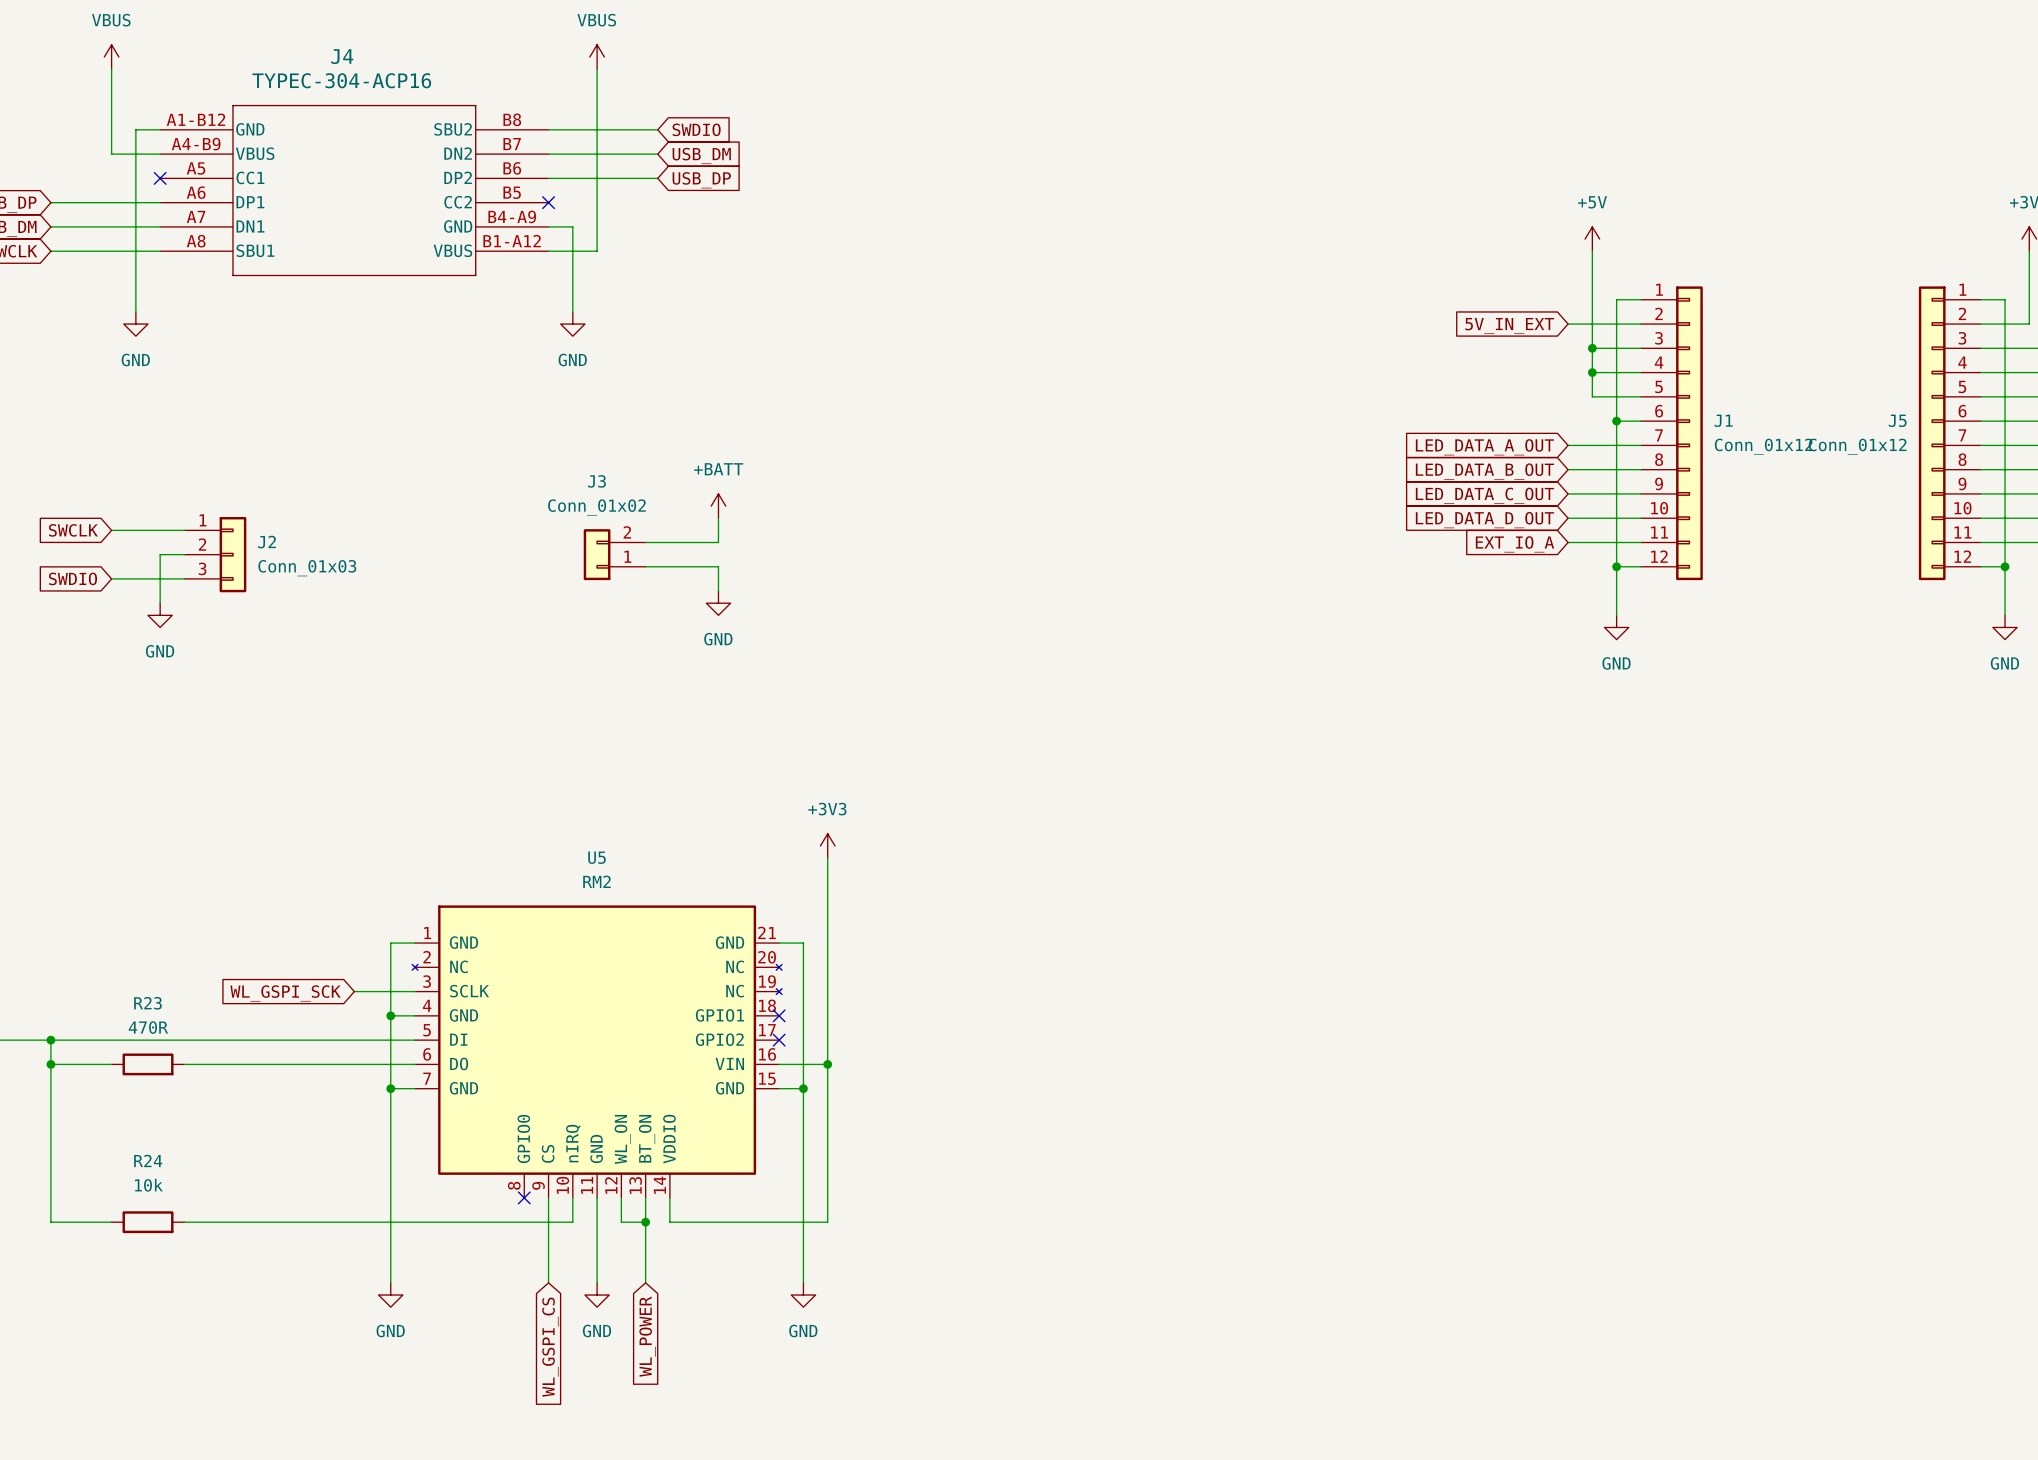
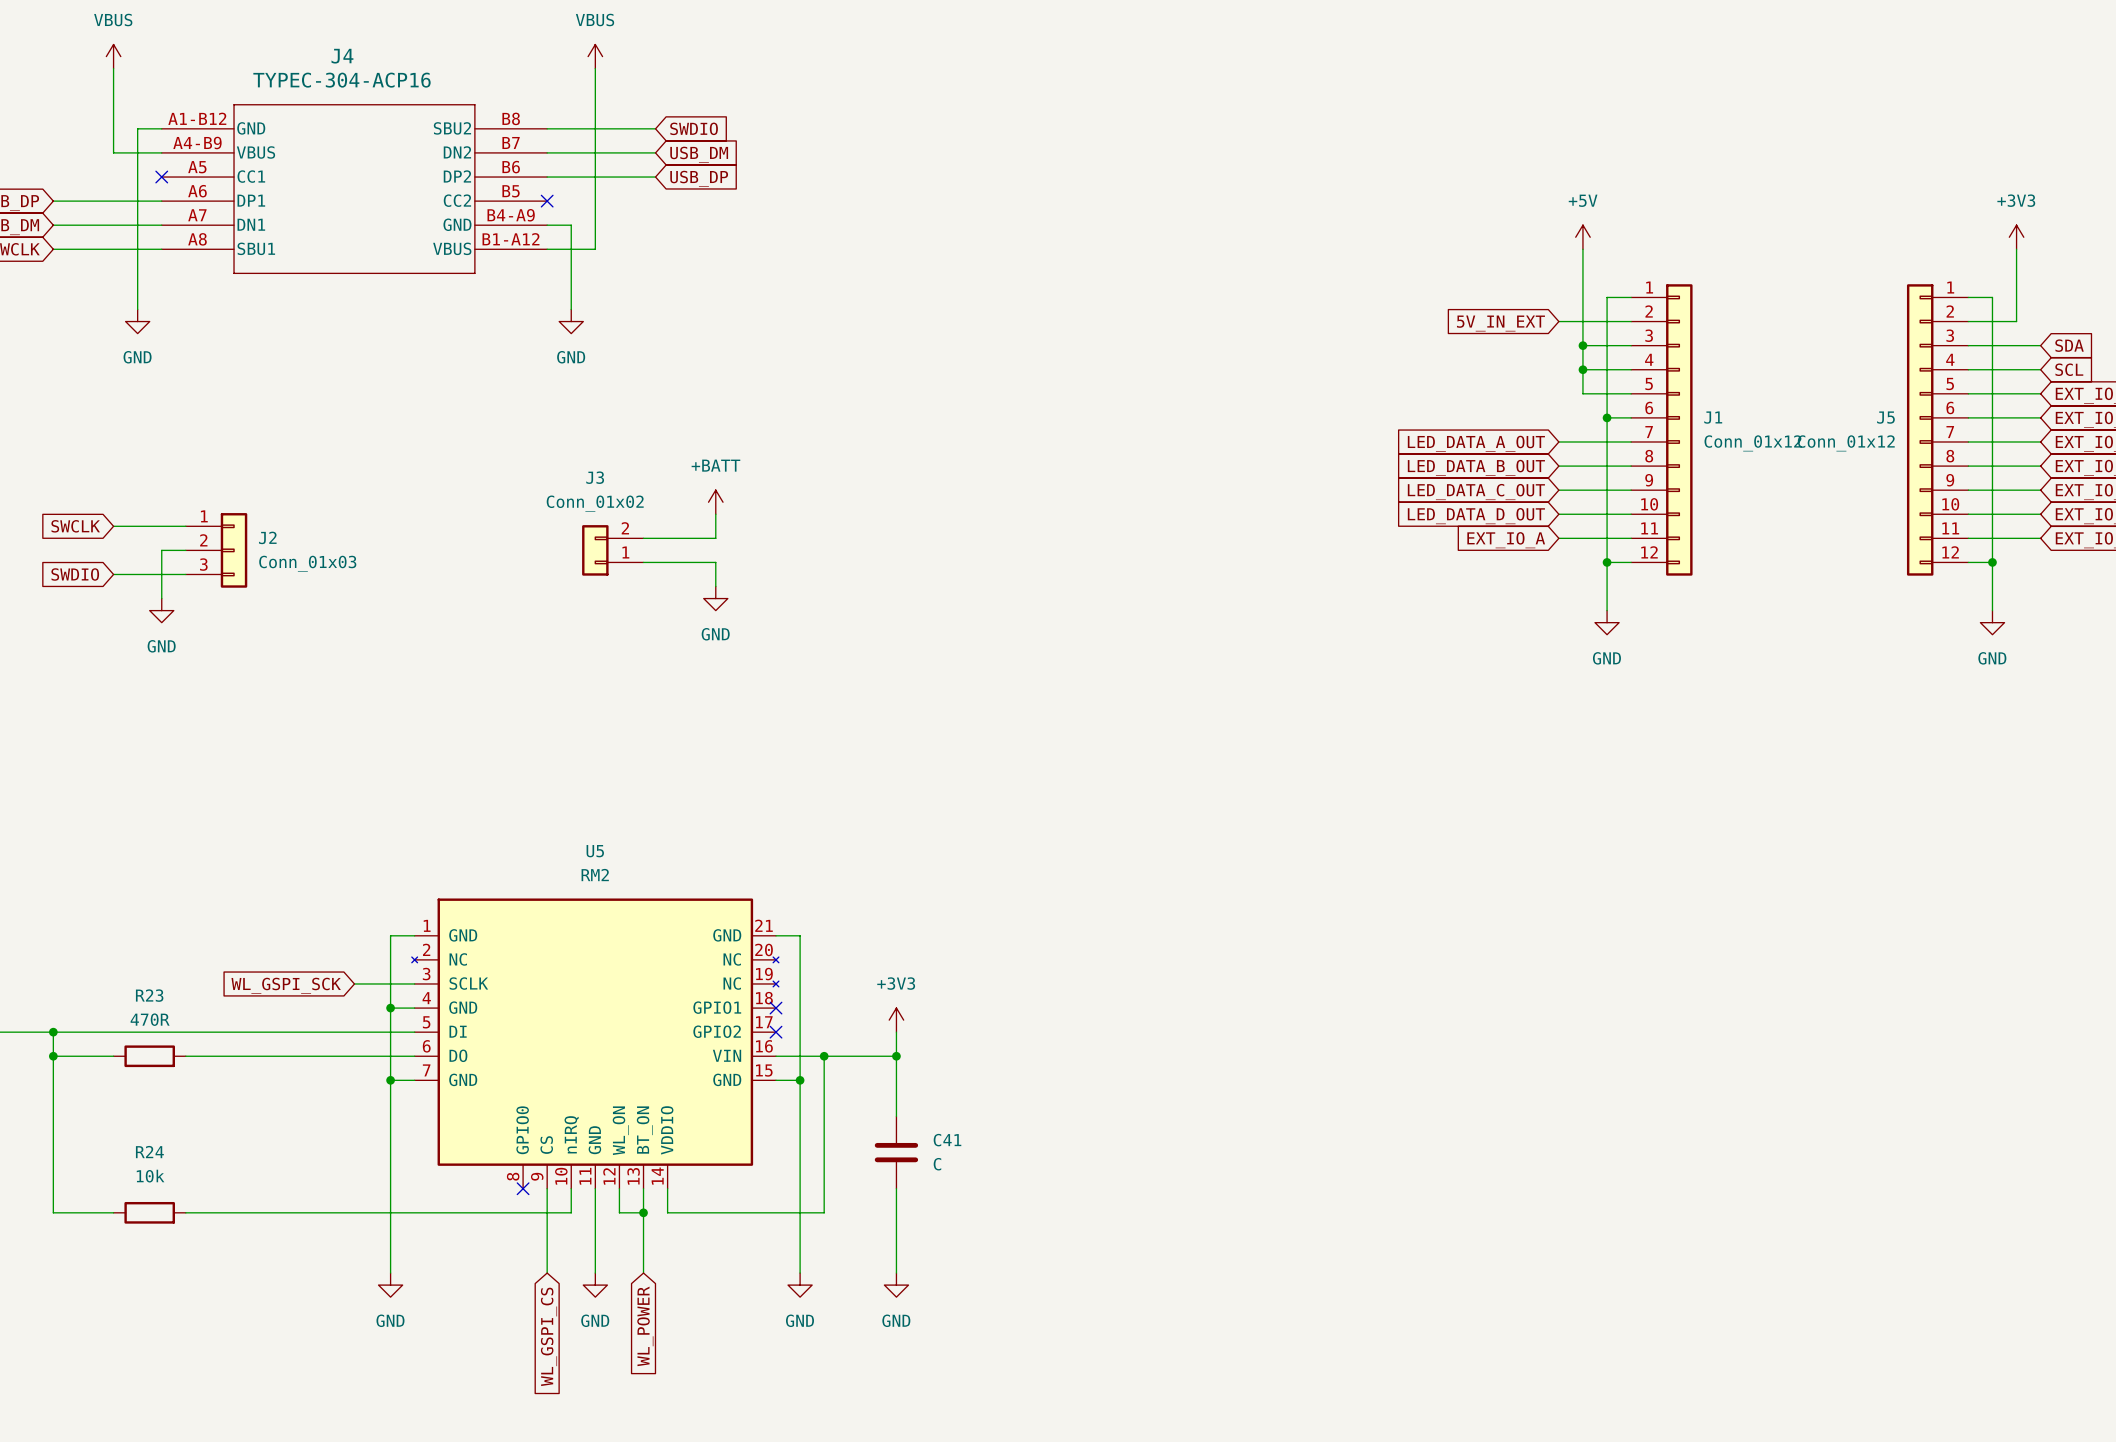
power symbol position: +3V3 (827, 845) -> +3V3 (896, 1020)
wire: (827, 858) (827, 1064) -> (896, 1056) (824, 1056)
wire: none -> (896, 1032) (896, 1116)
junction: none -> (896, 1056)
C41: none -> C (896, 1152)
wire: none -> (896, 1188) (896, 1273)
power symbol: none -> GND (896, 1285)

